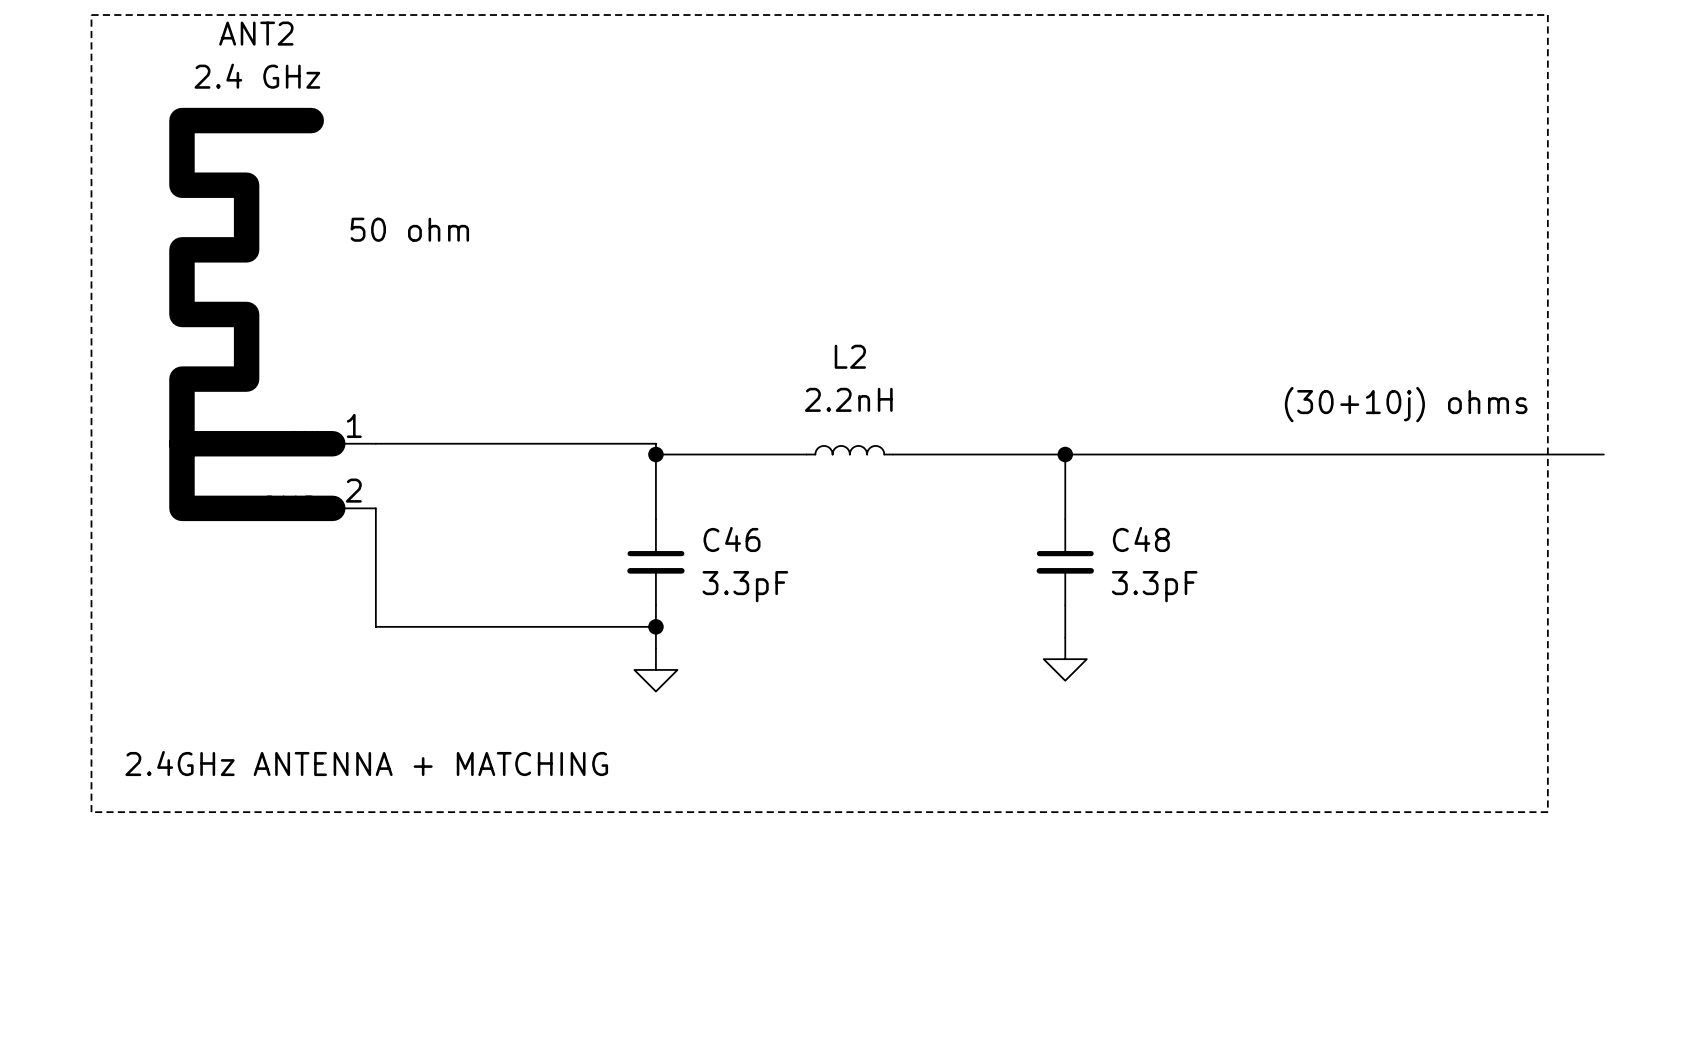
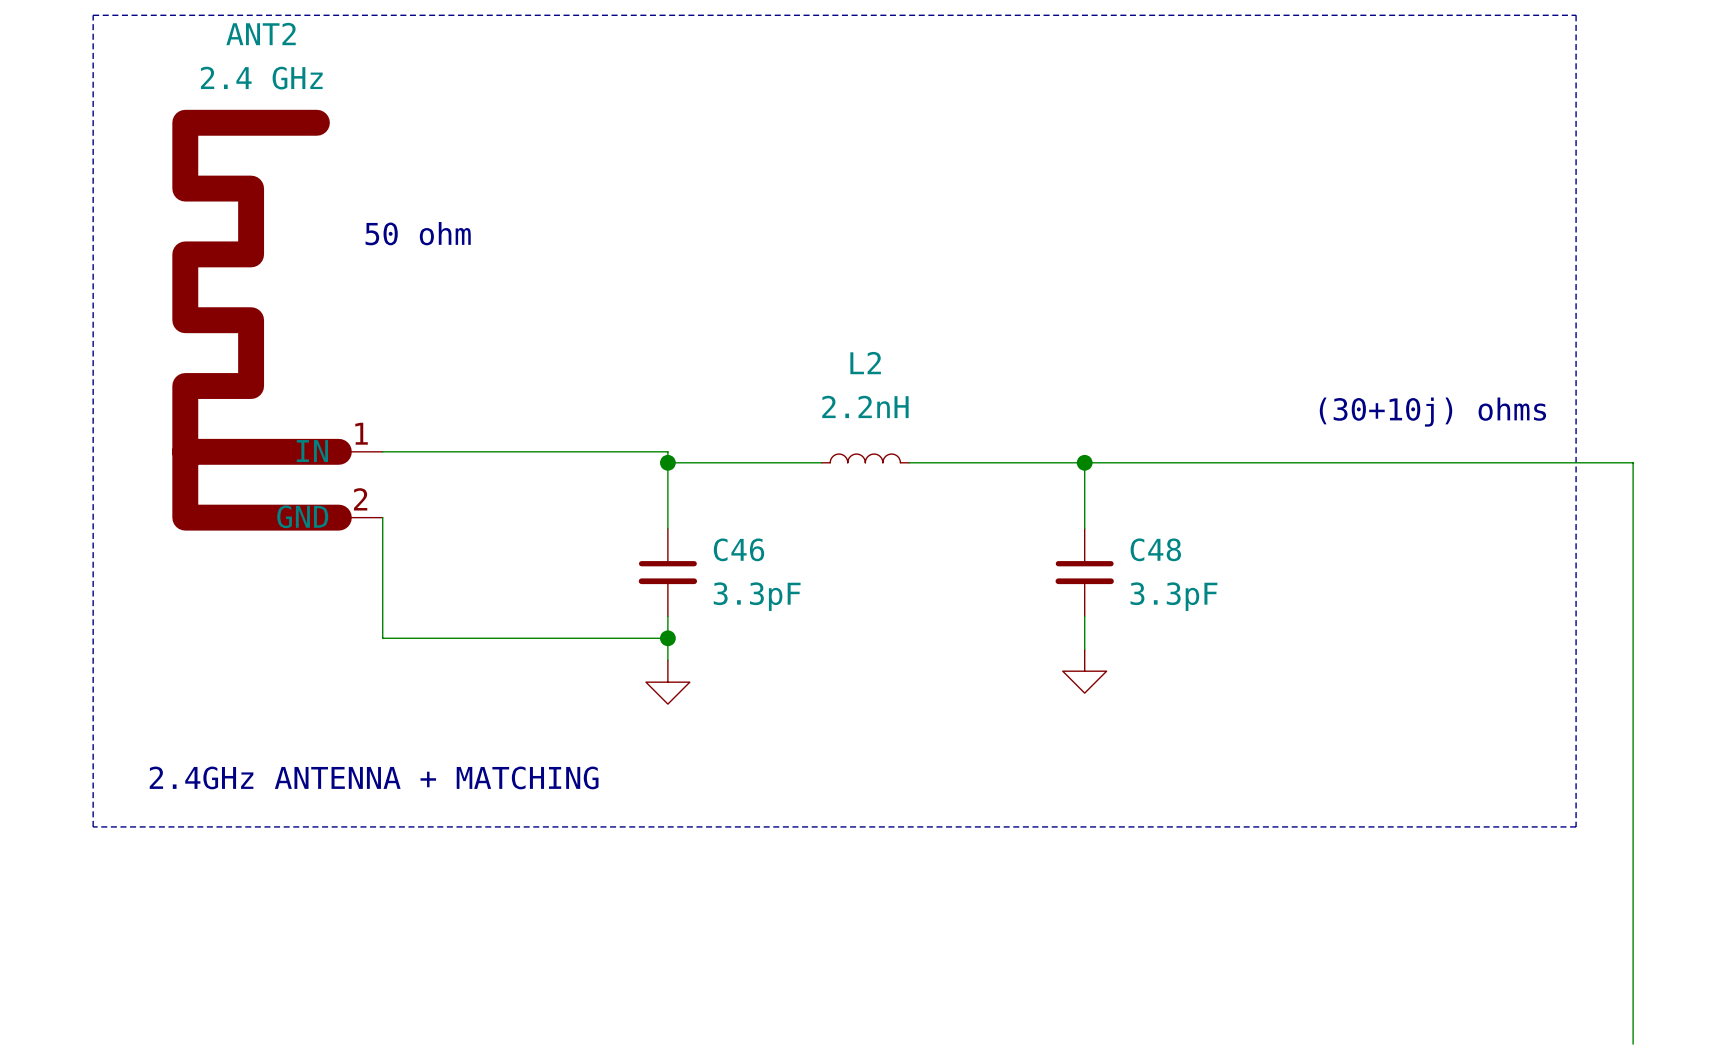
wire: none -> (1633, 462) (1633, 1044)

